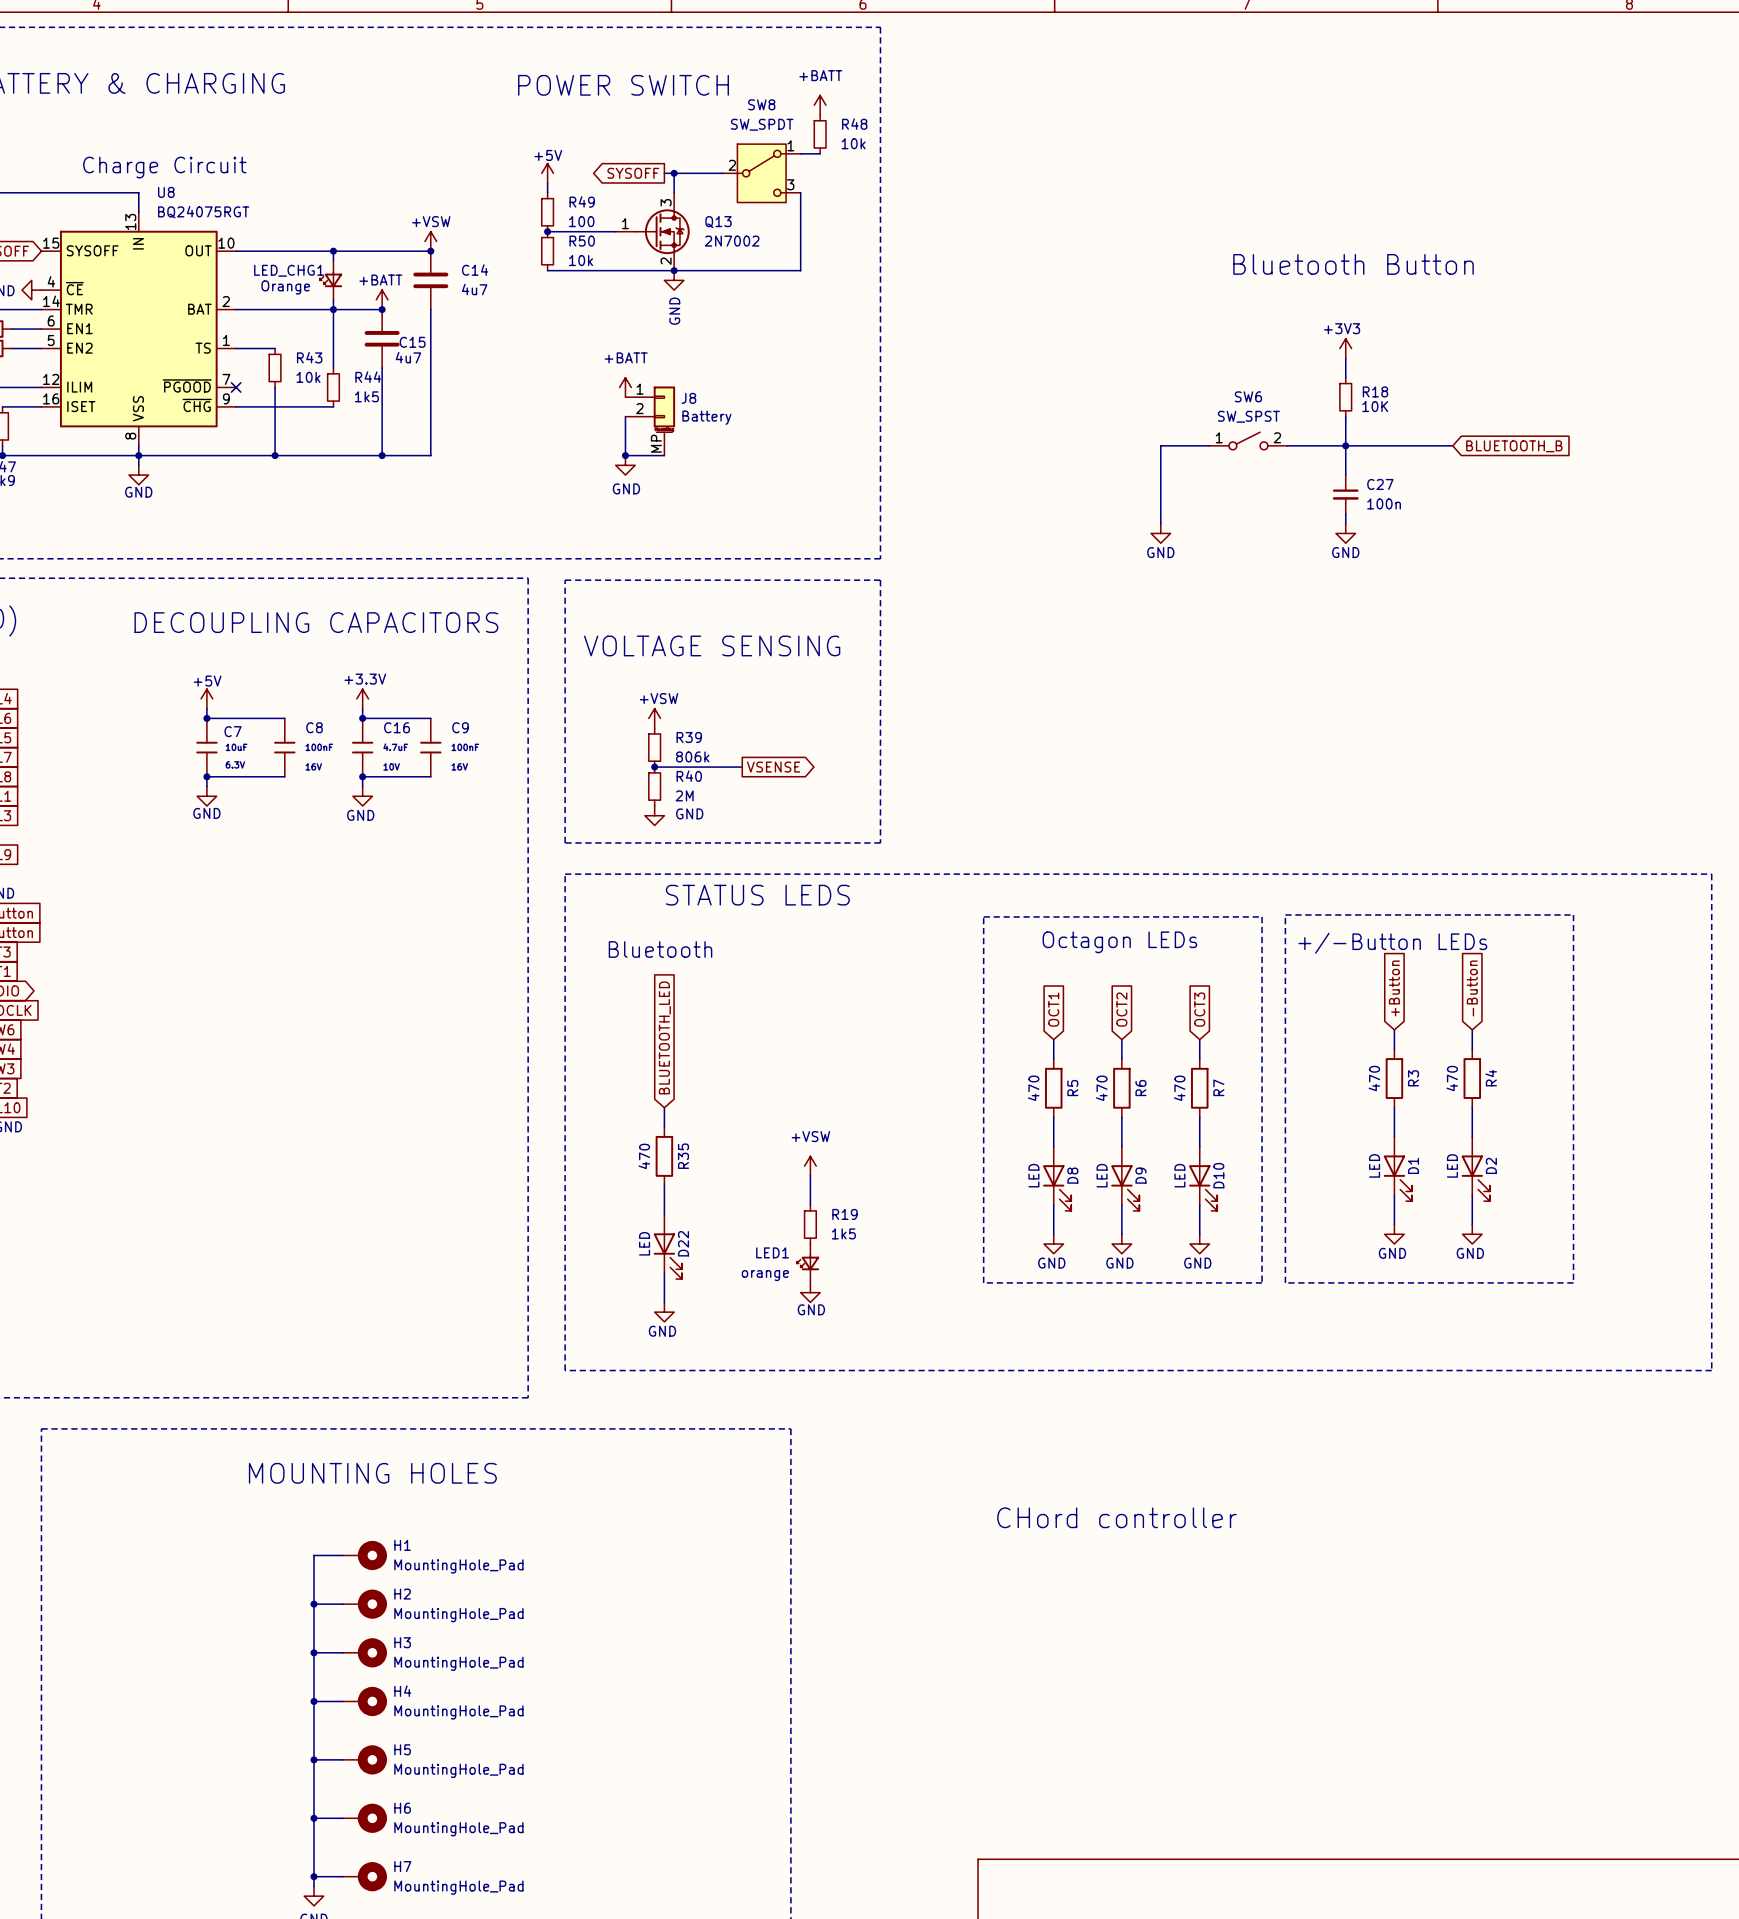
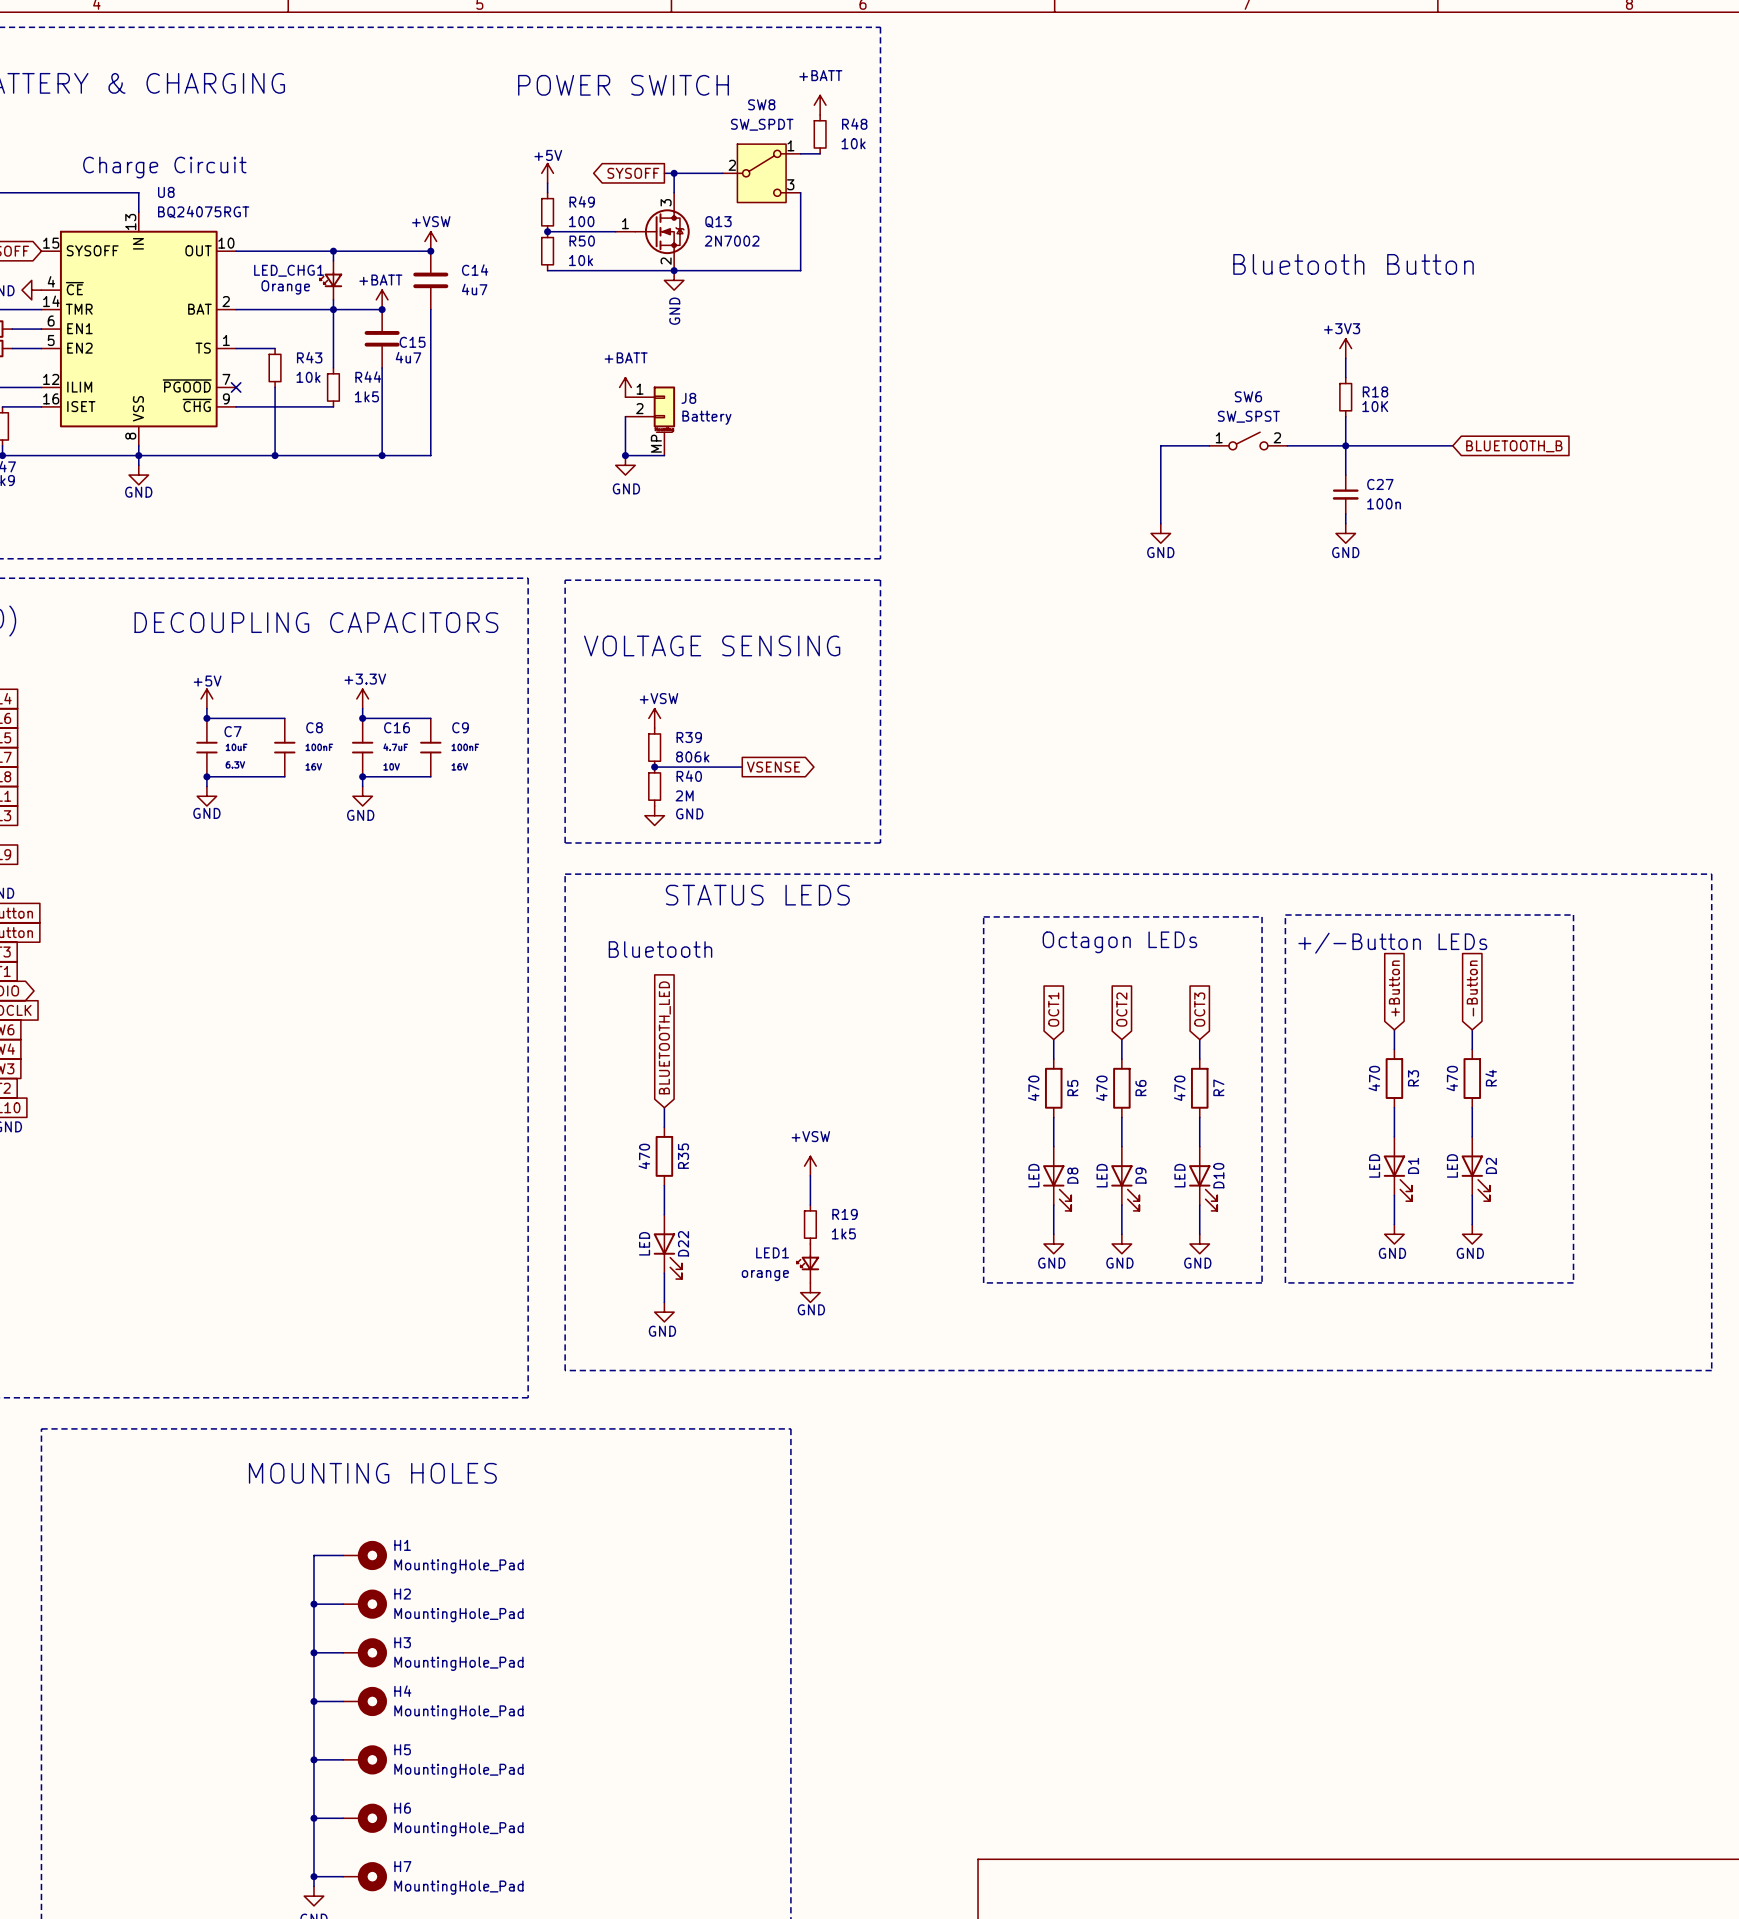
text: CHord controller (1116, 1517) -> none

